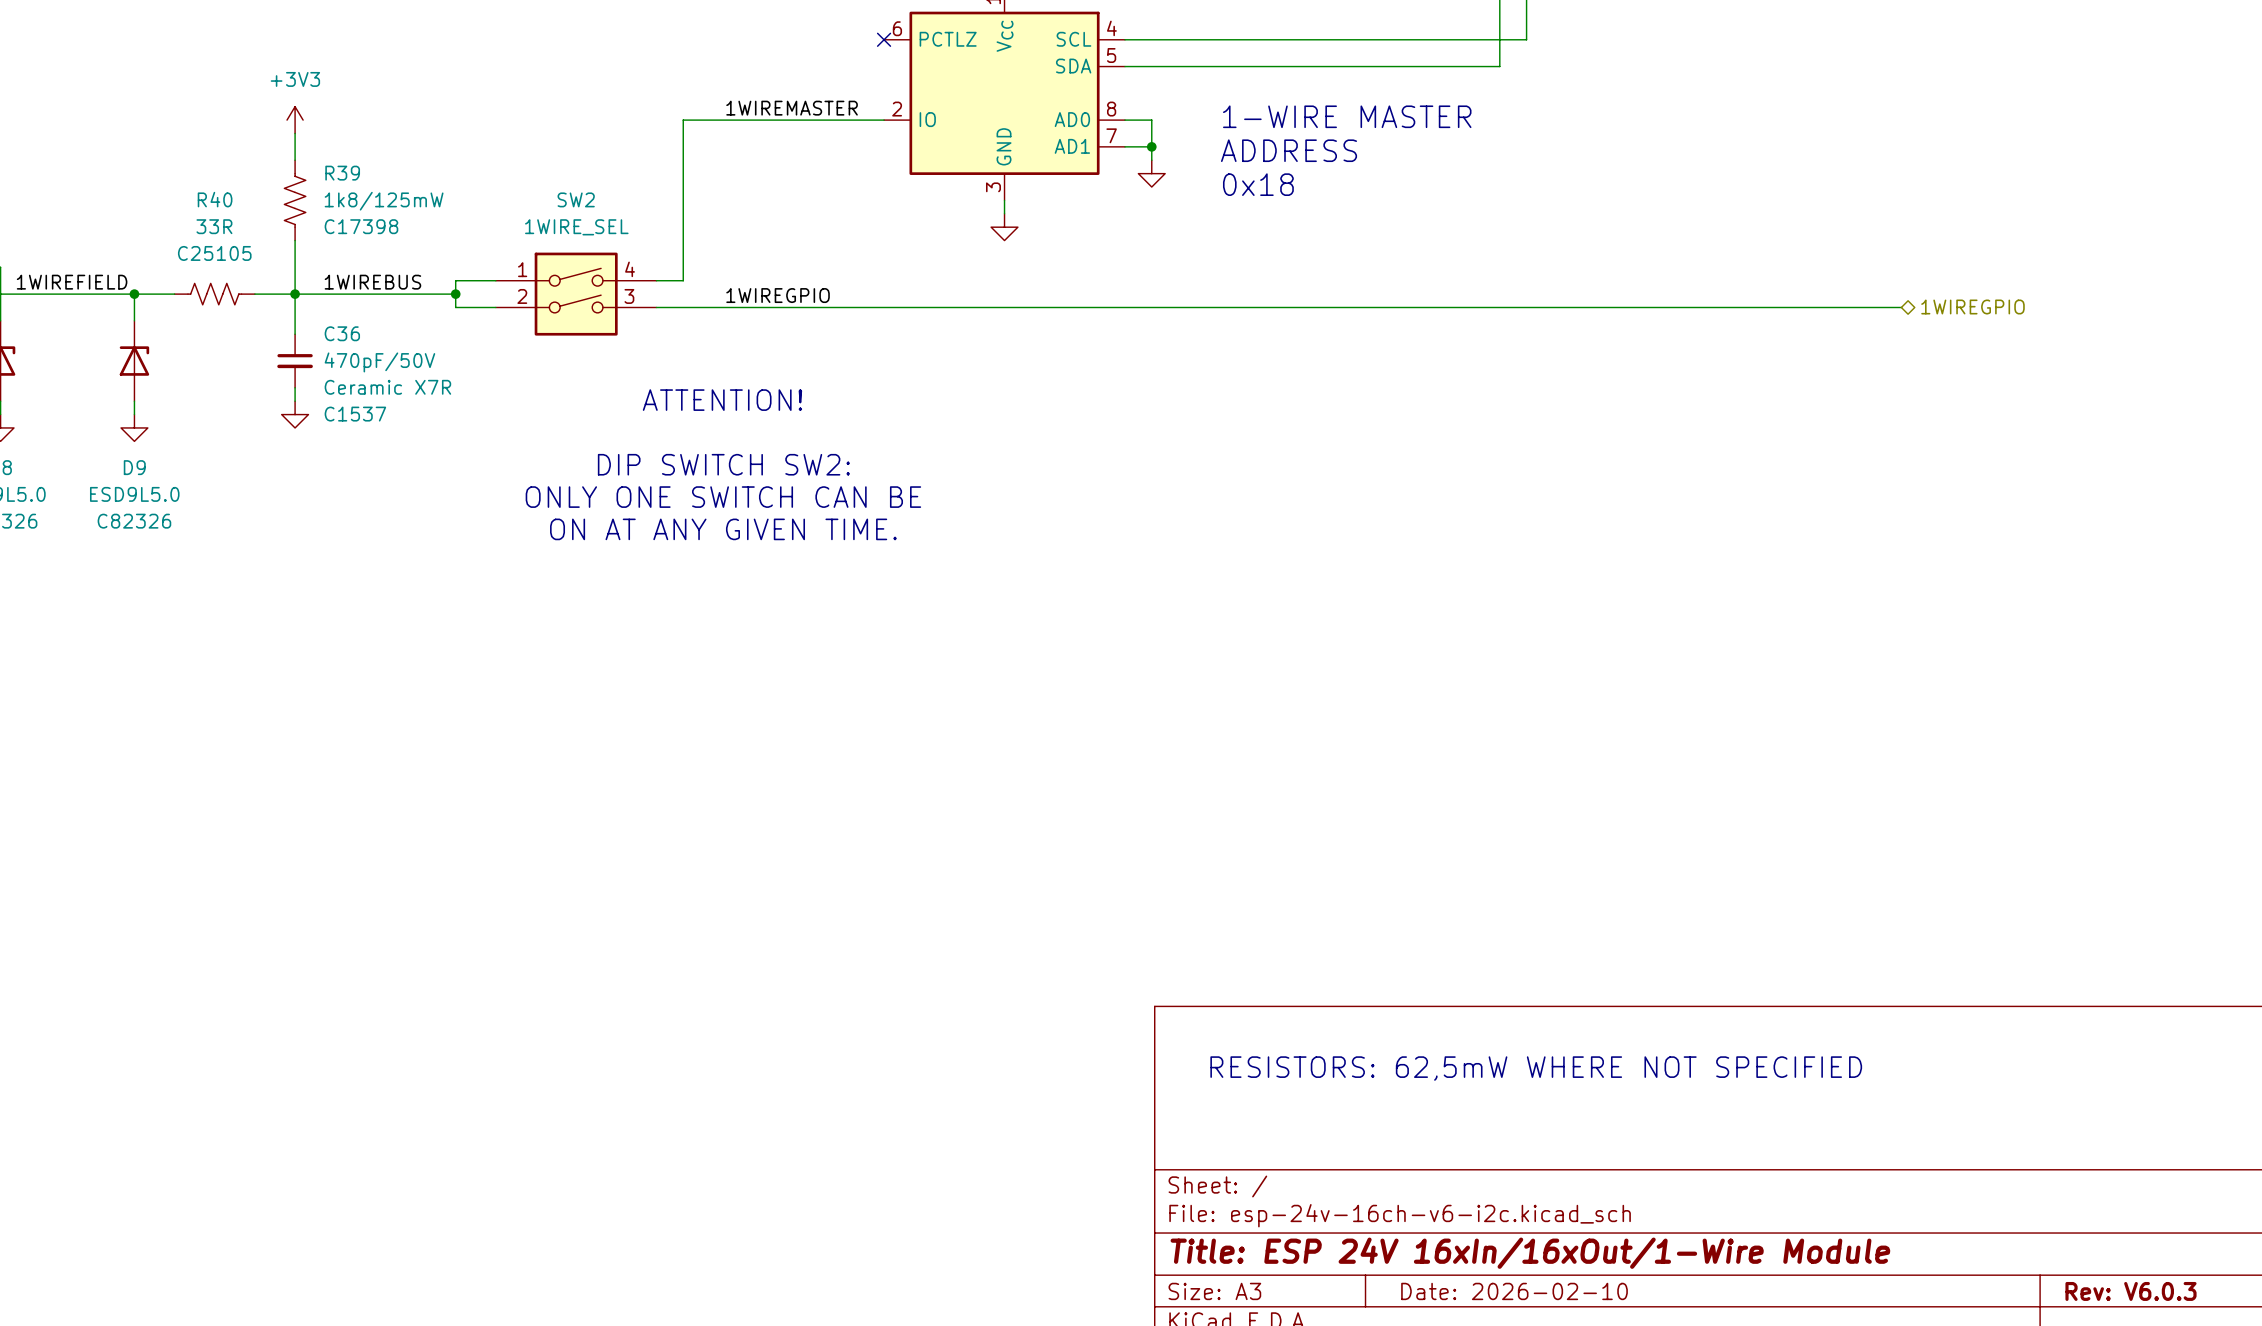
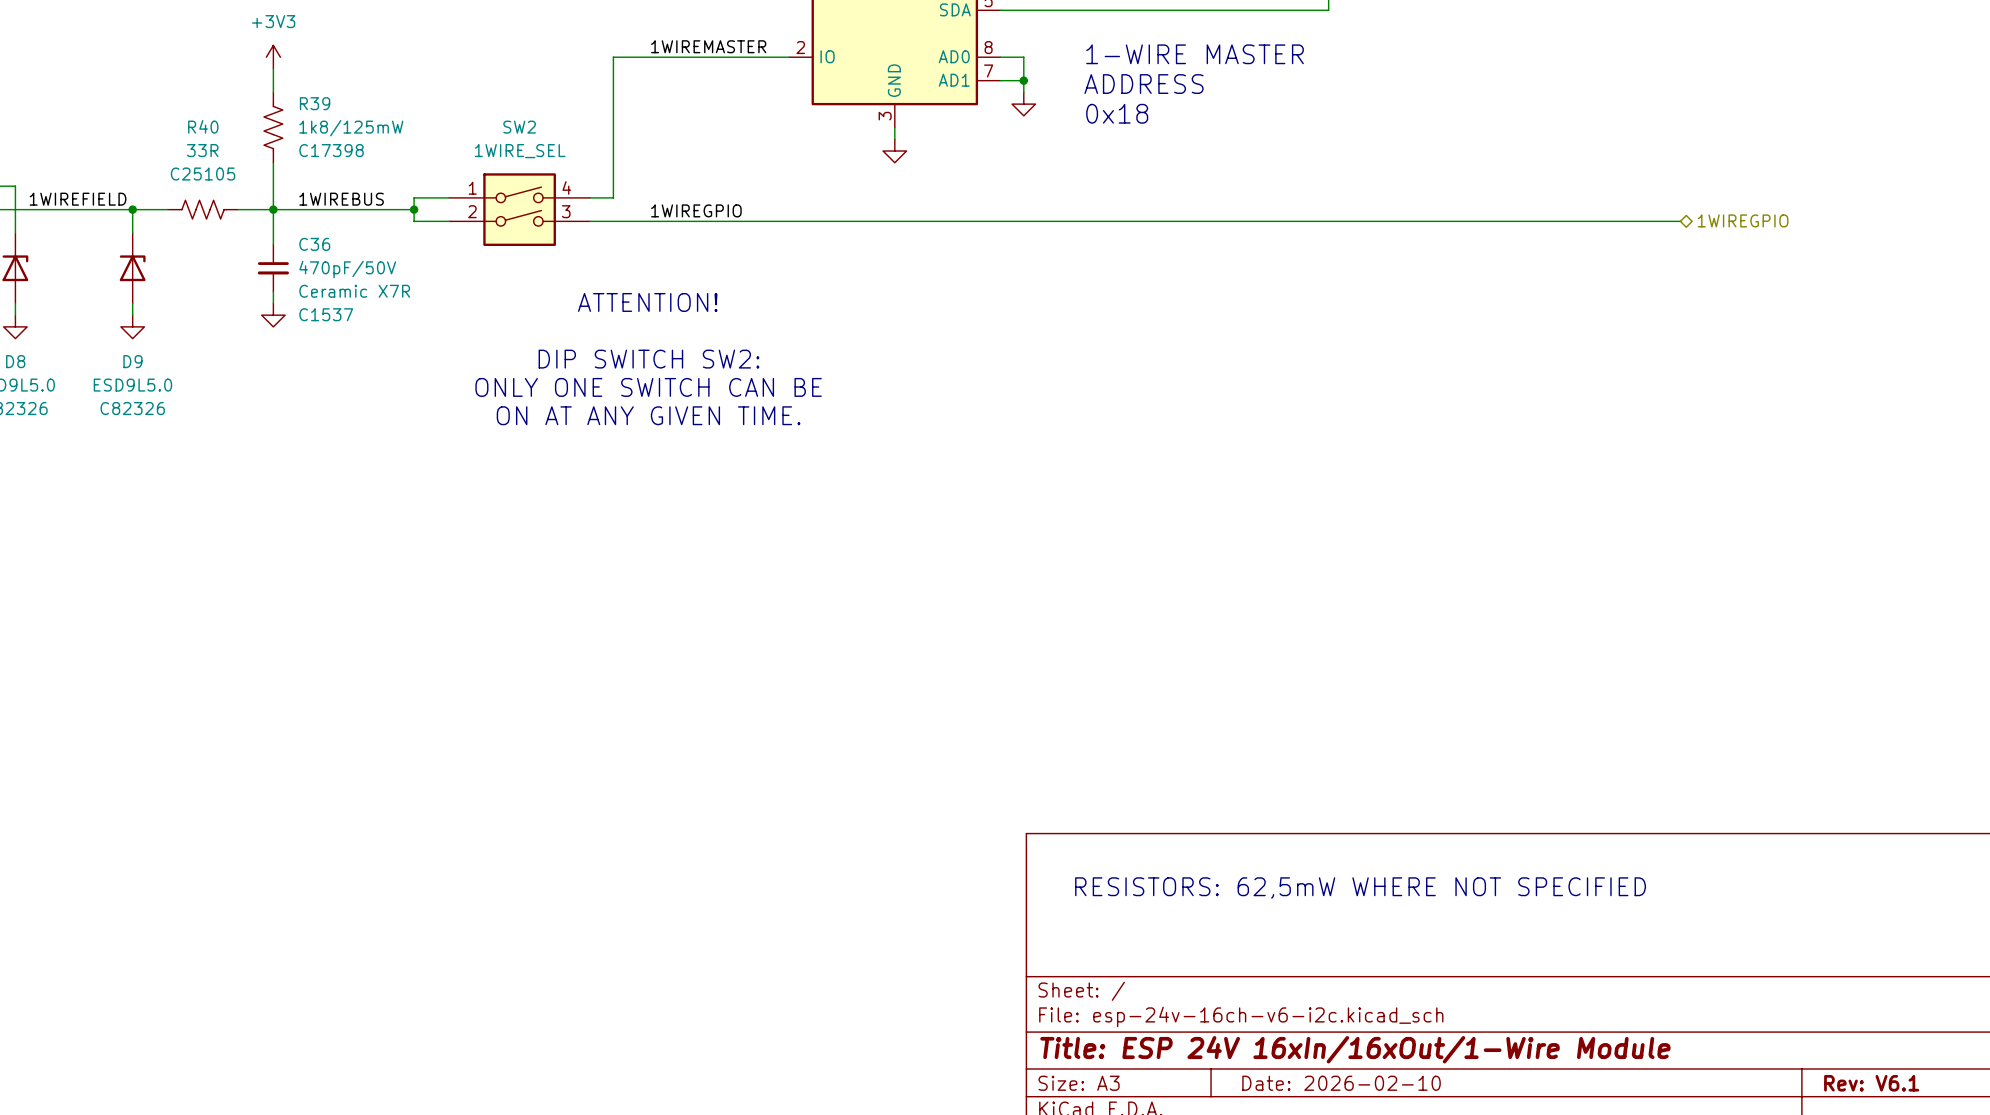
title block: Rev: V6.0.3 (2131, 1291) -> Rev: V6.1 (1871, 1083)

